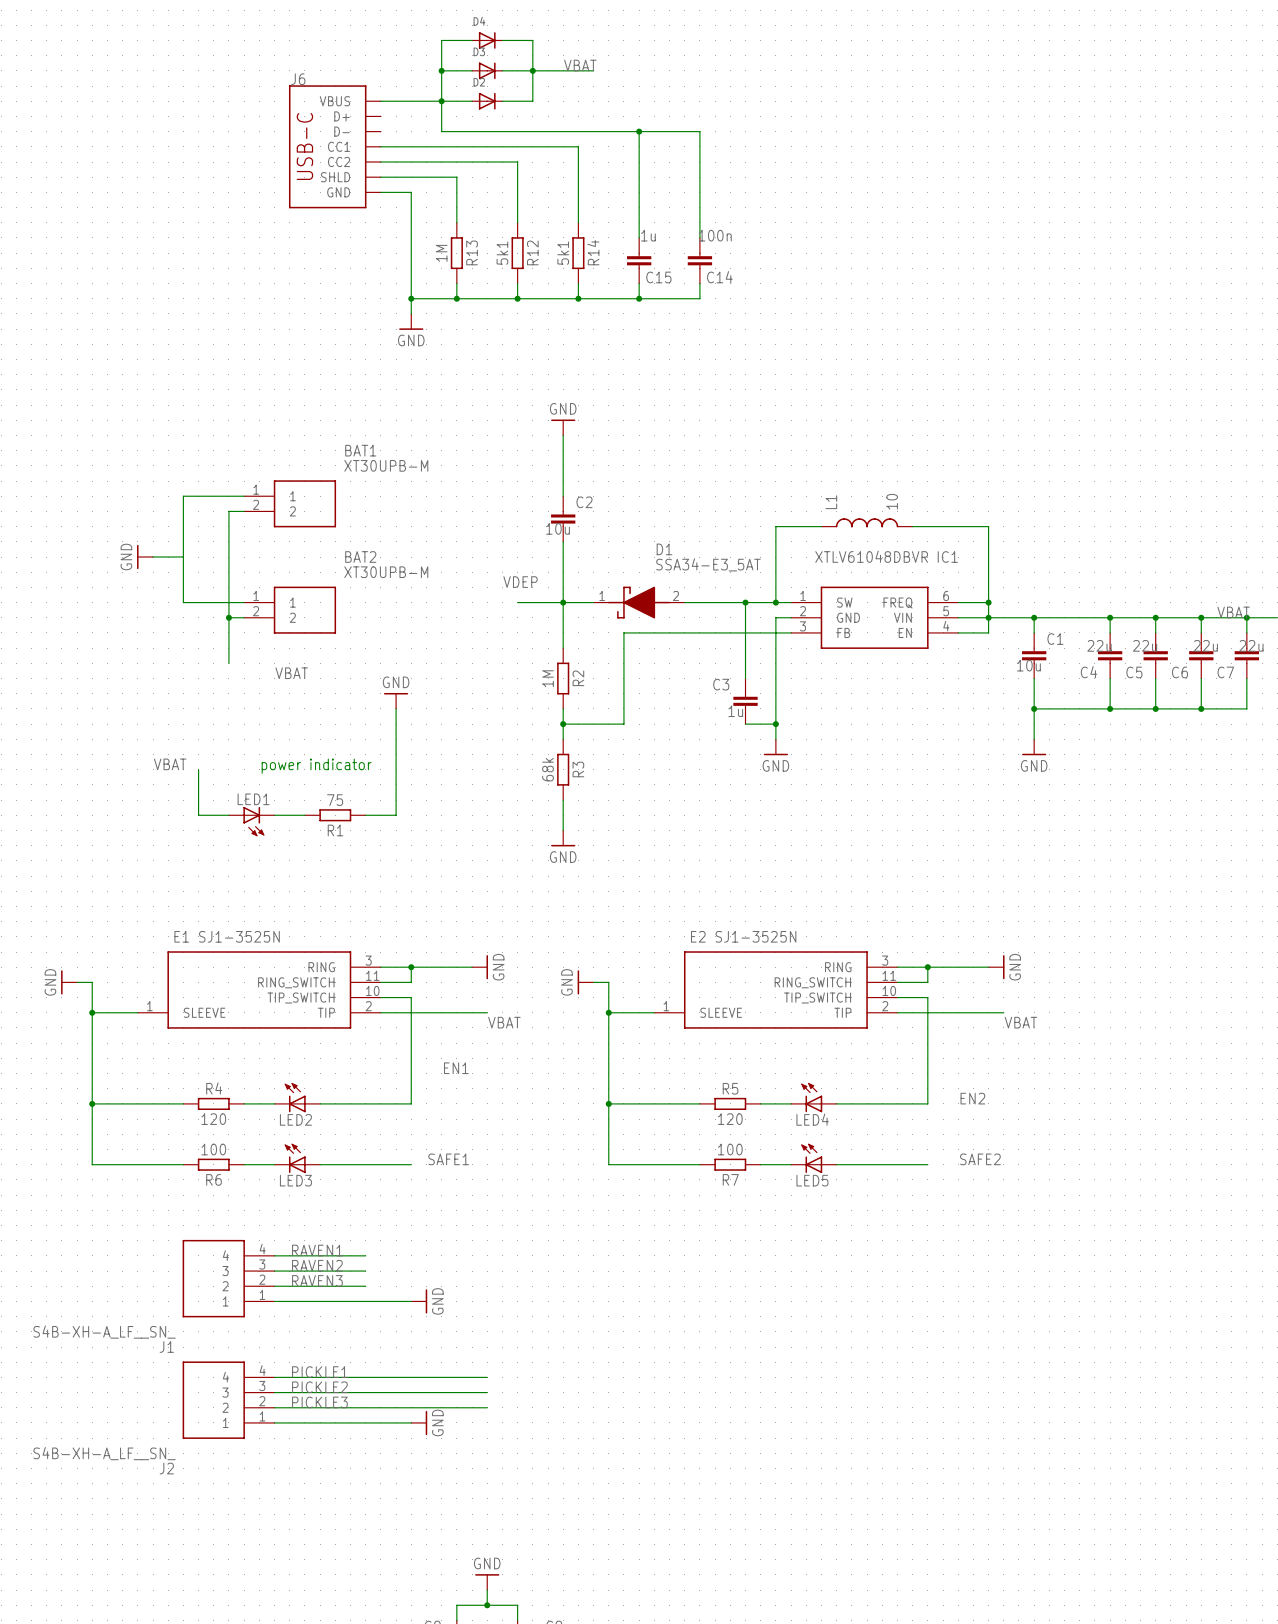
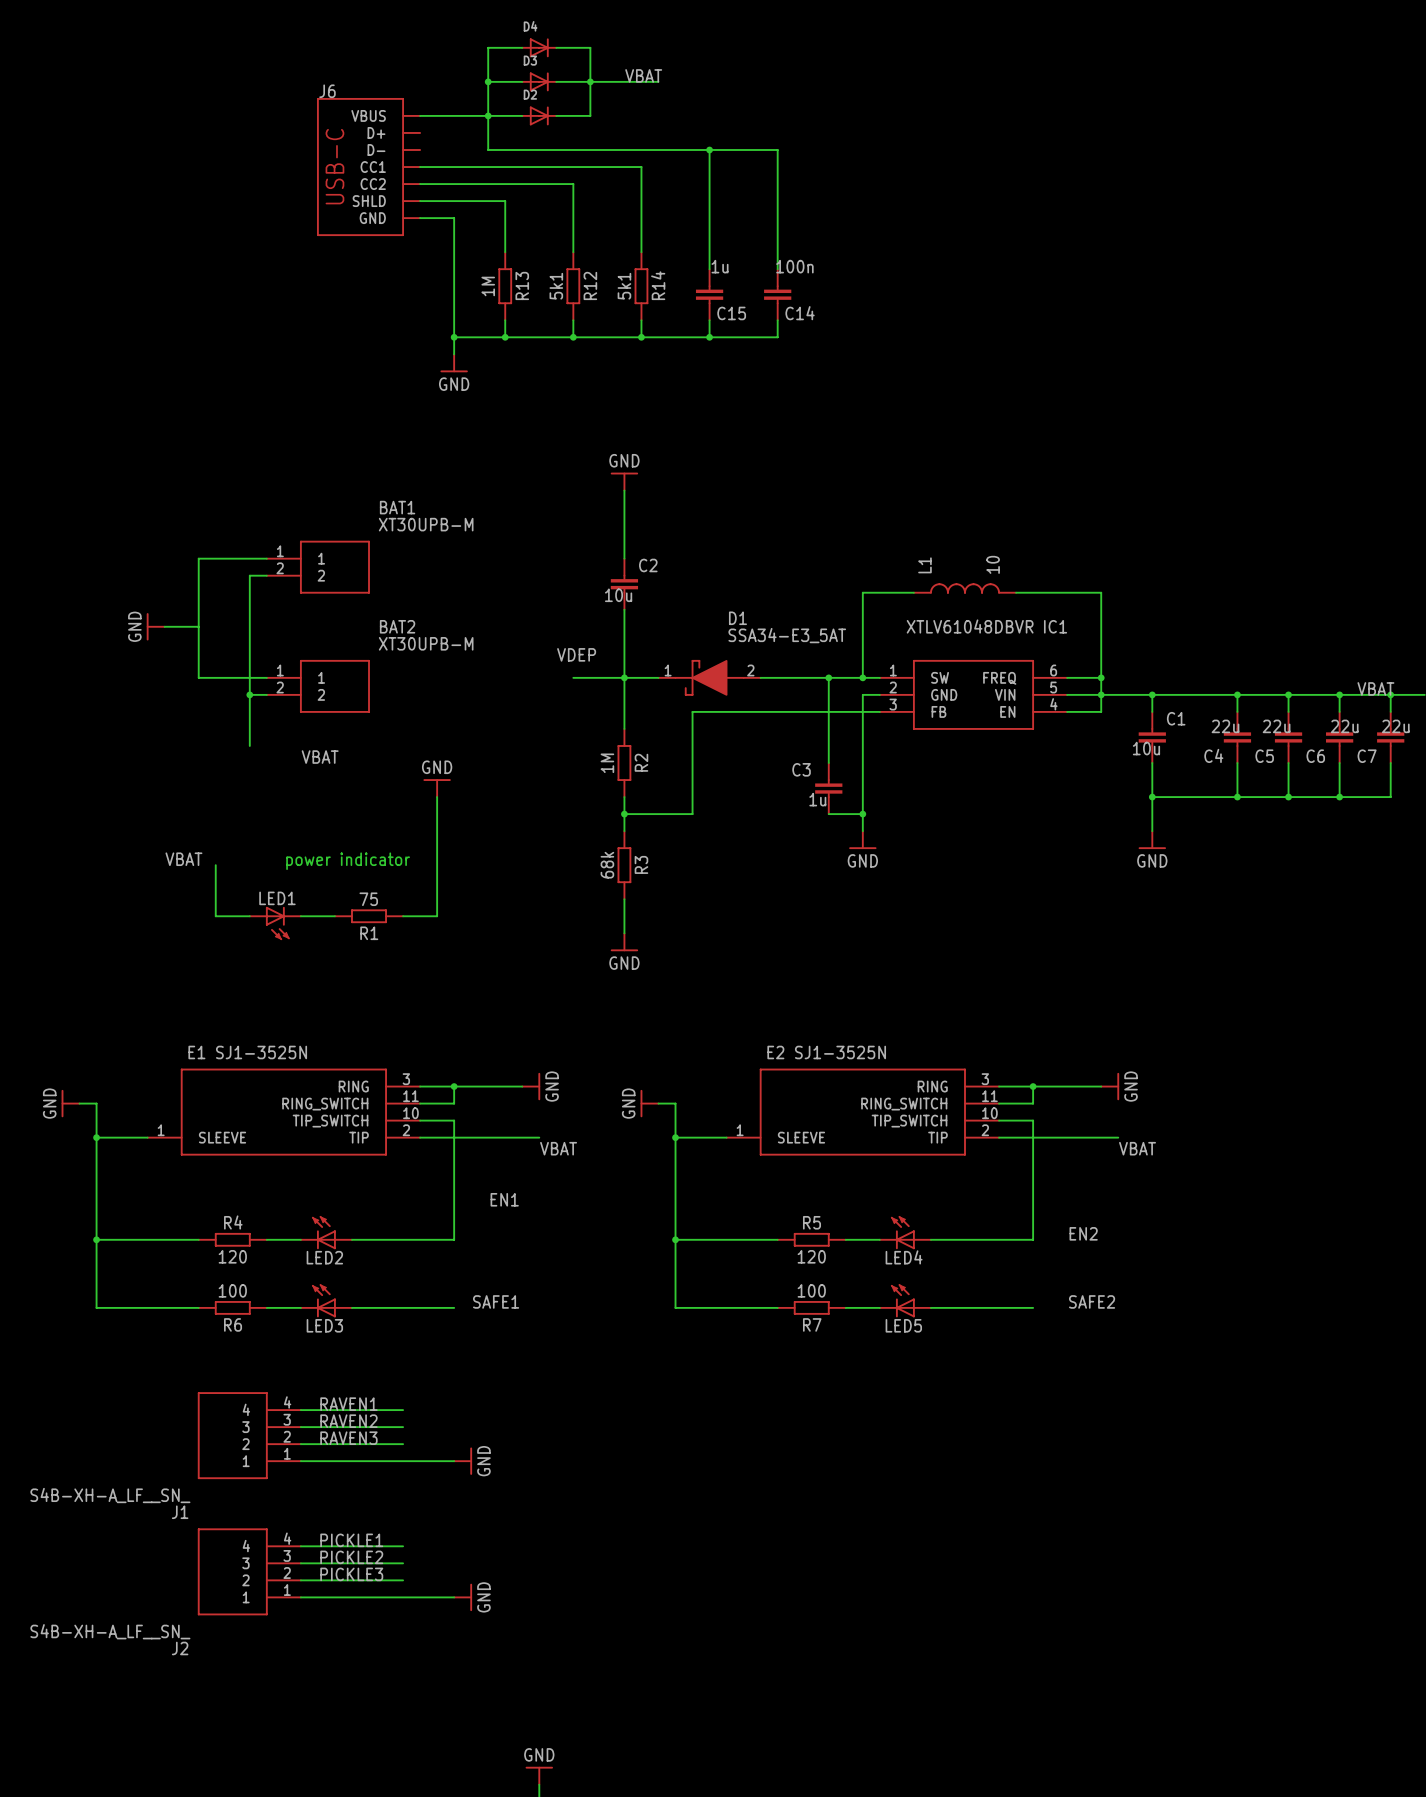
wire: (365, 1377) (487, 1377) -> none
wire: (365, 1392) (487, 1392) -> none
wire: (365, 1407) (487, 1407) -> none

